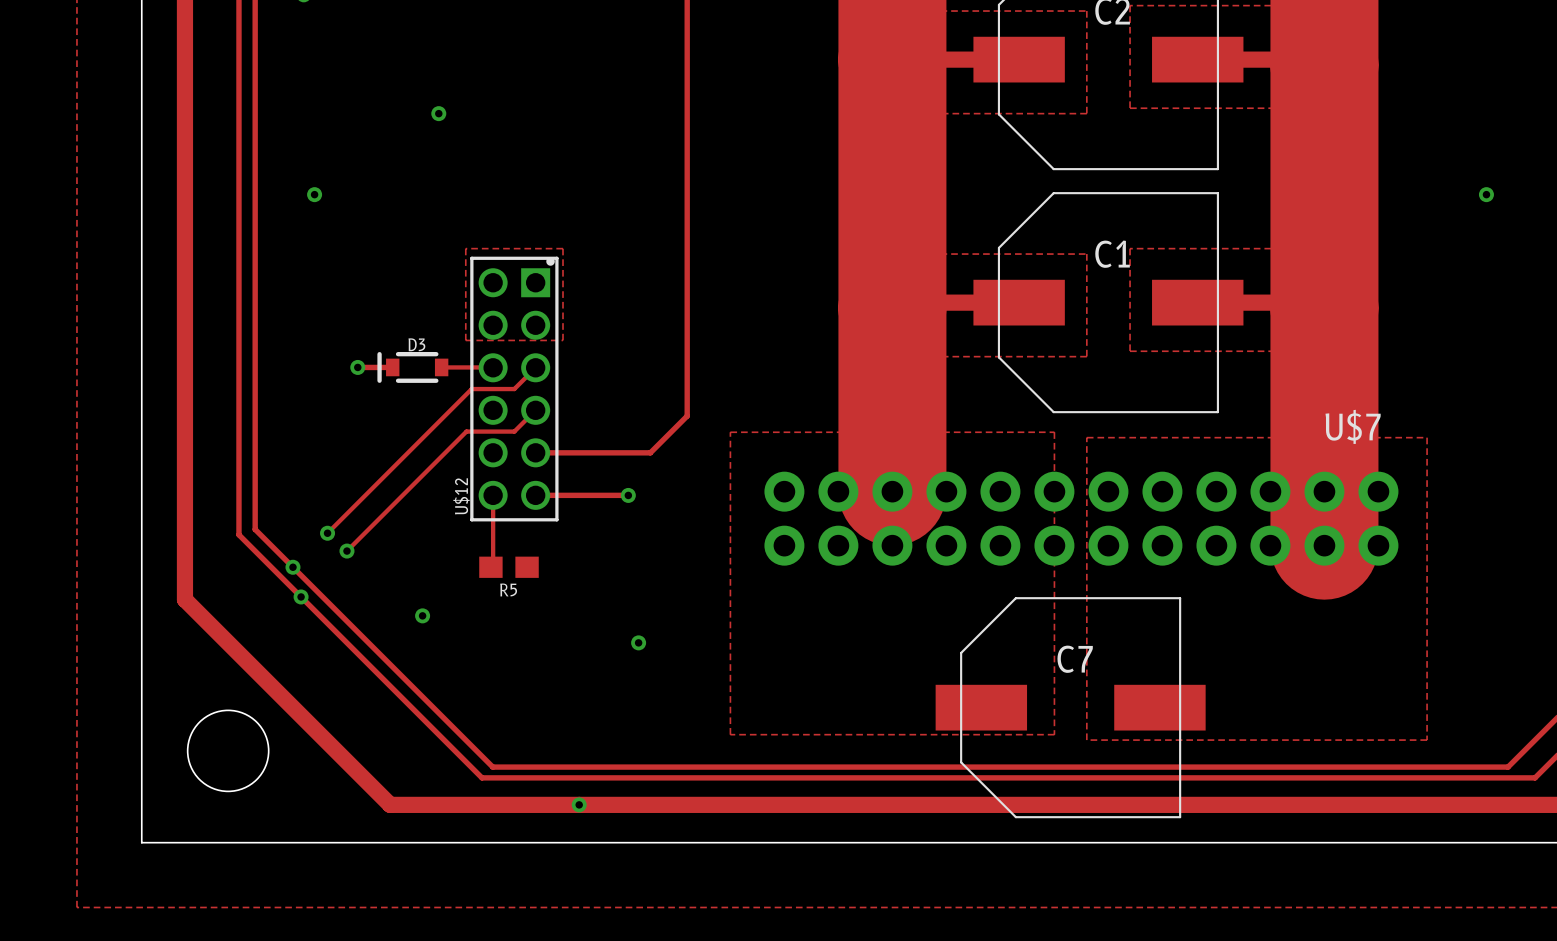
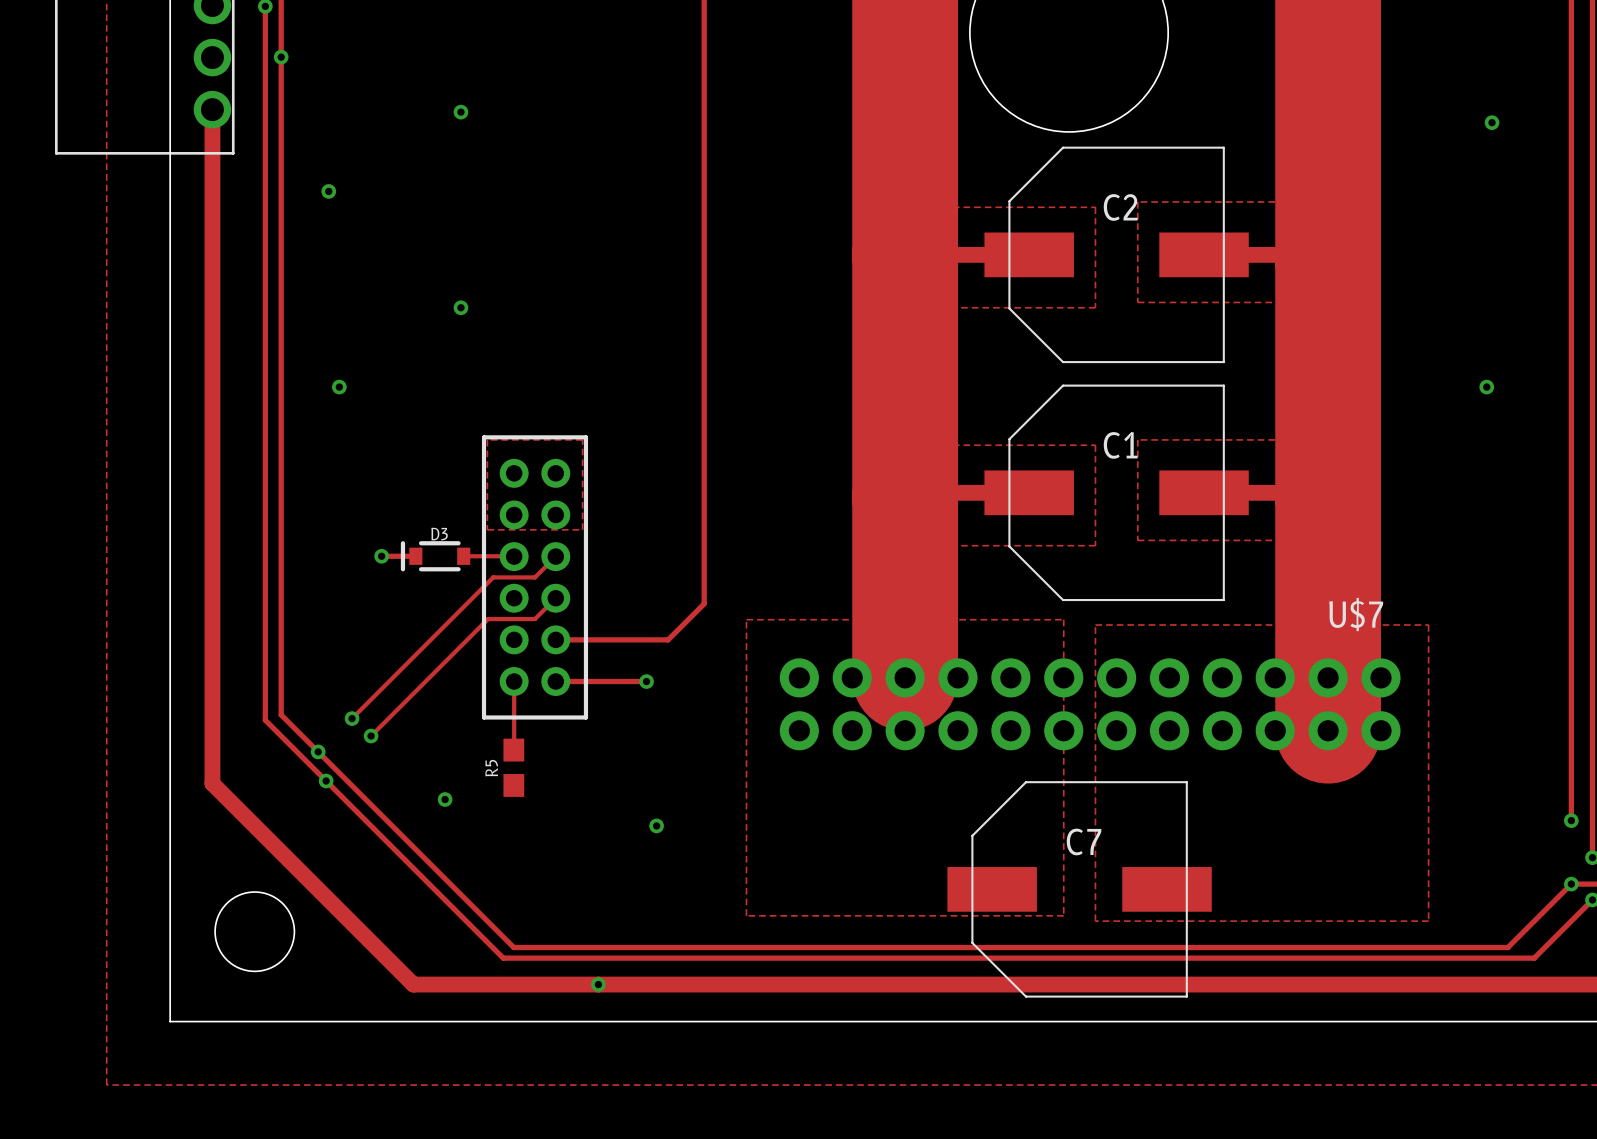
U$12: (514, 389) -> none
part: none -> (534, 577)
R5 rotation: 0° (508, 567) -> 90° clockwise (513, 767)

